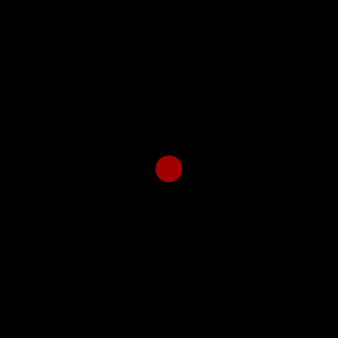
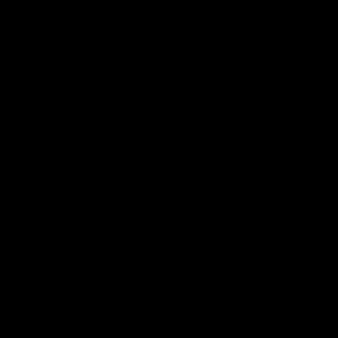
part: (168, 168) -> none

